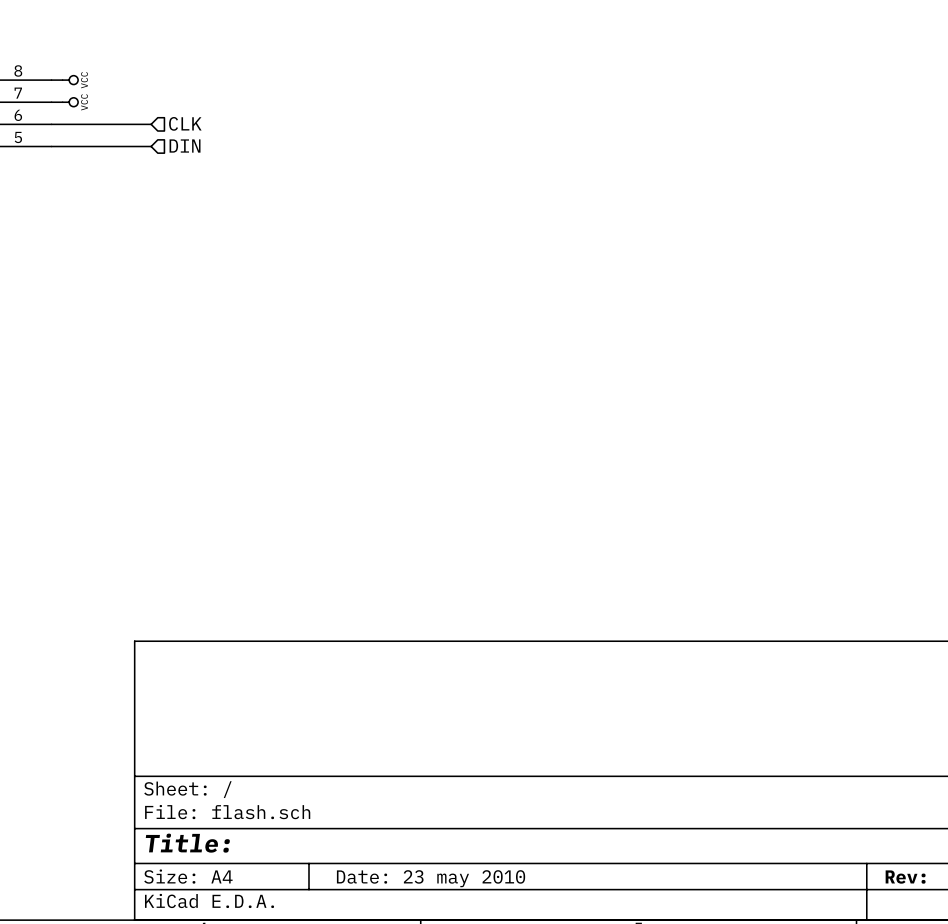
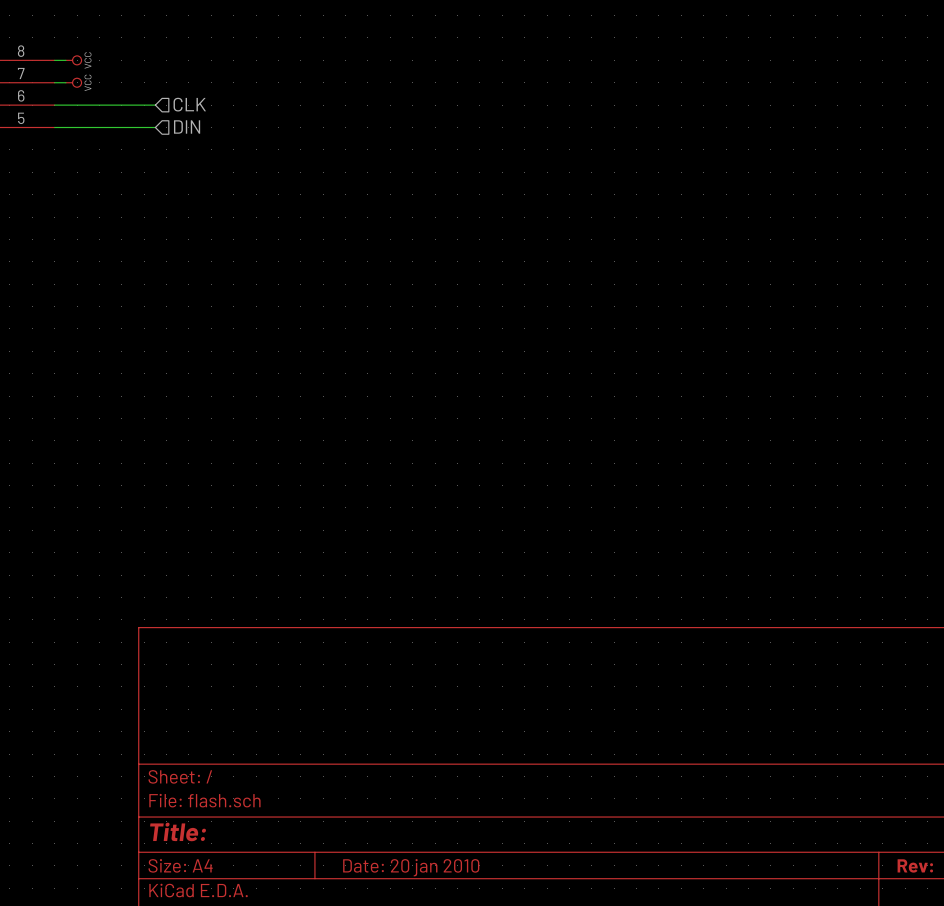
title block: Date: 23 may 2010 (431, 878) -> Date: 20 jan 2010 (411, 867)

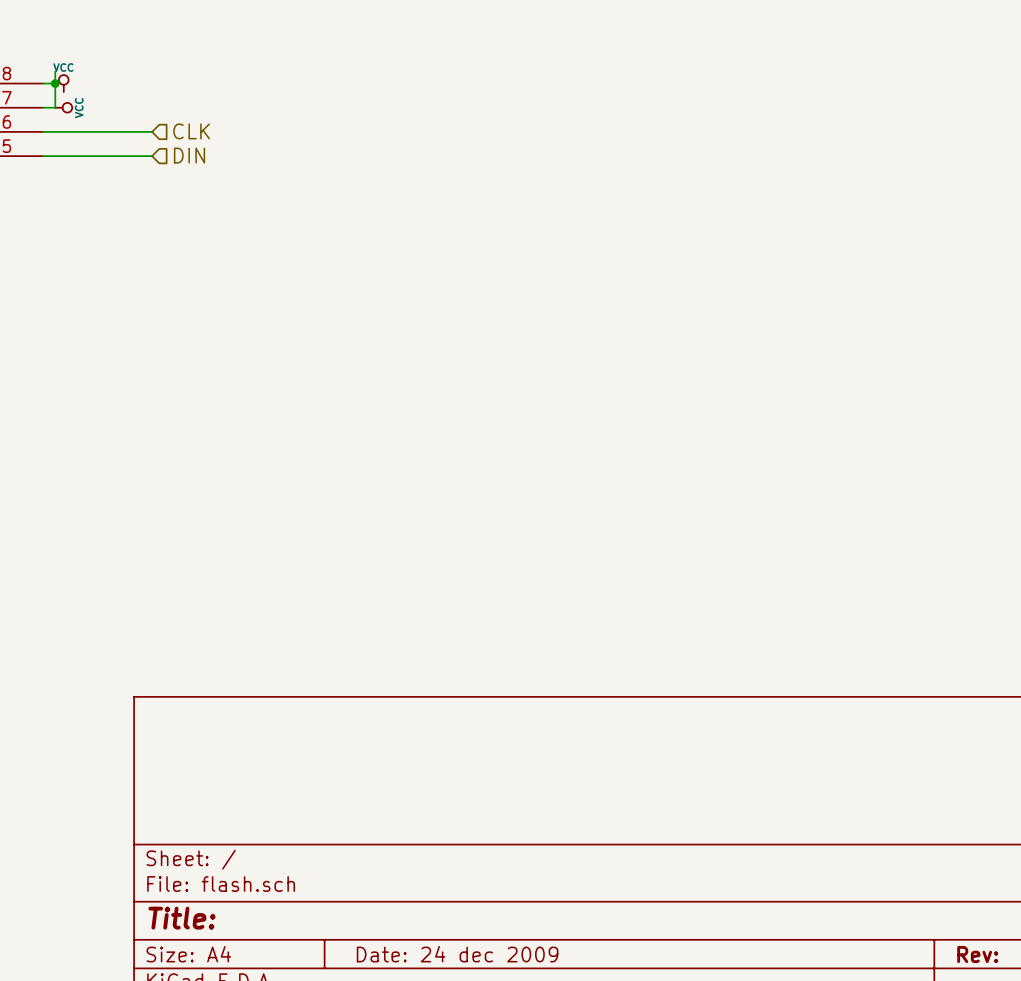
wire: none -> (55, 71) (55, 107)
junction: none -> (55, 83)
power symbol rotation: 0° (73, 60) -> 90° counterclockwise (63, 83)
title block: Date: 20 jan 2010 (411, 867) -> Date: 24 dec 2009 (457, 954)

